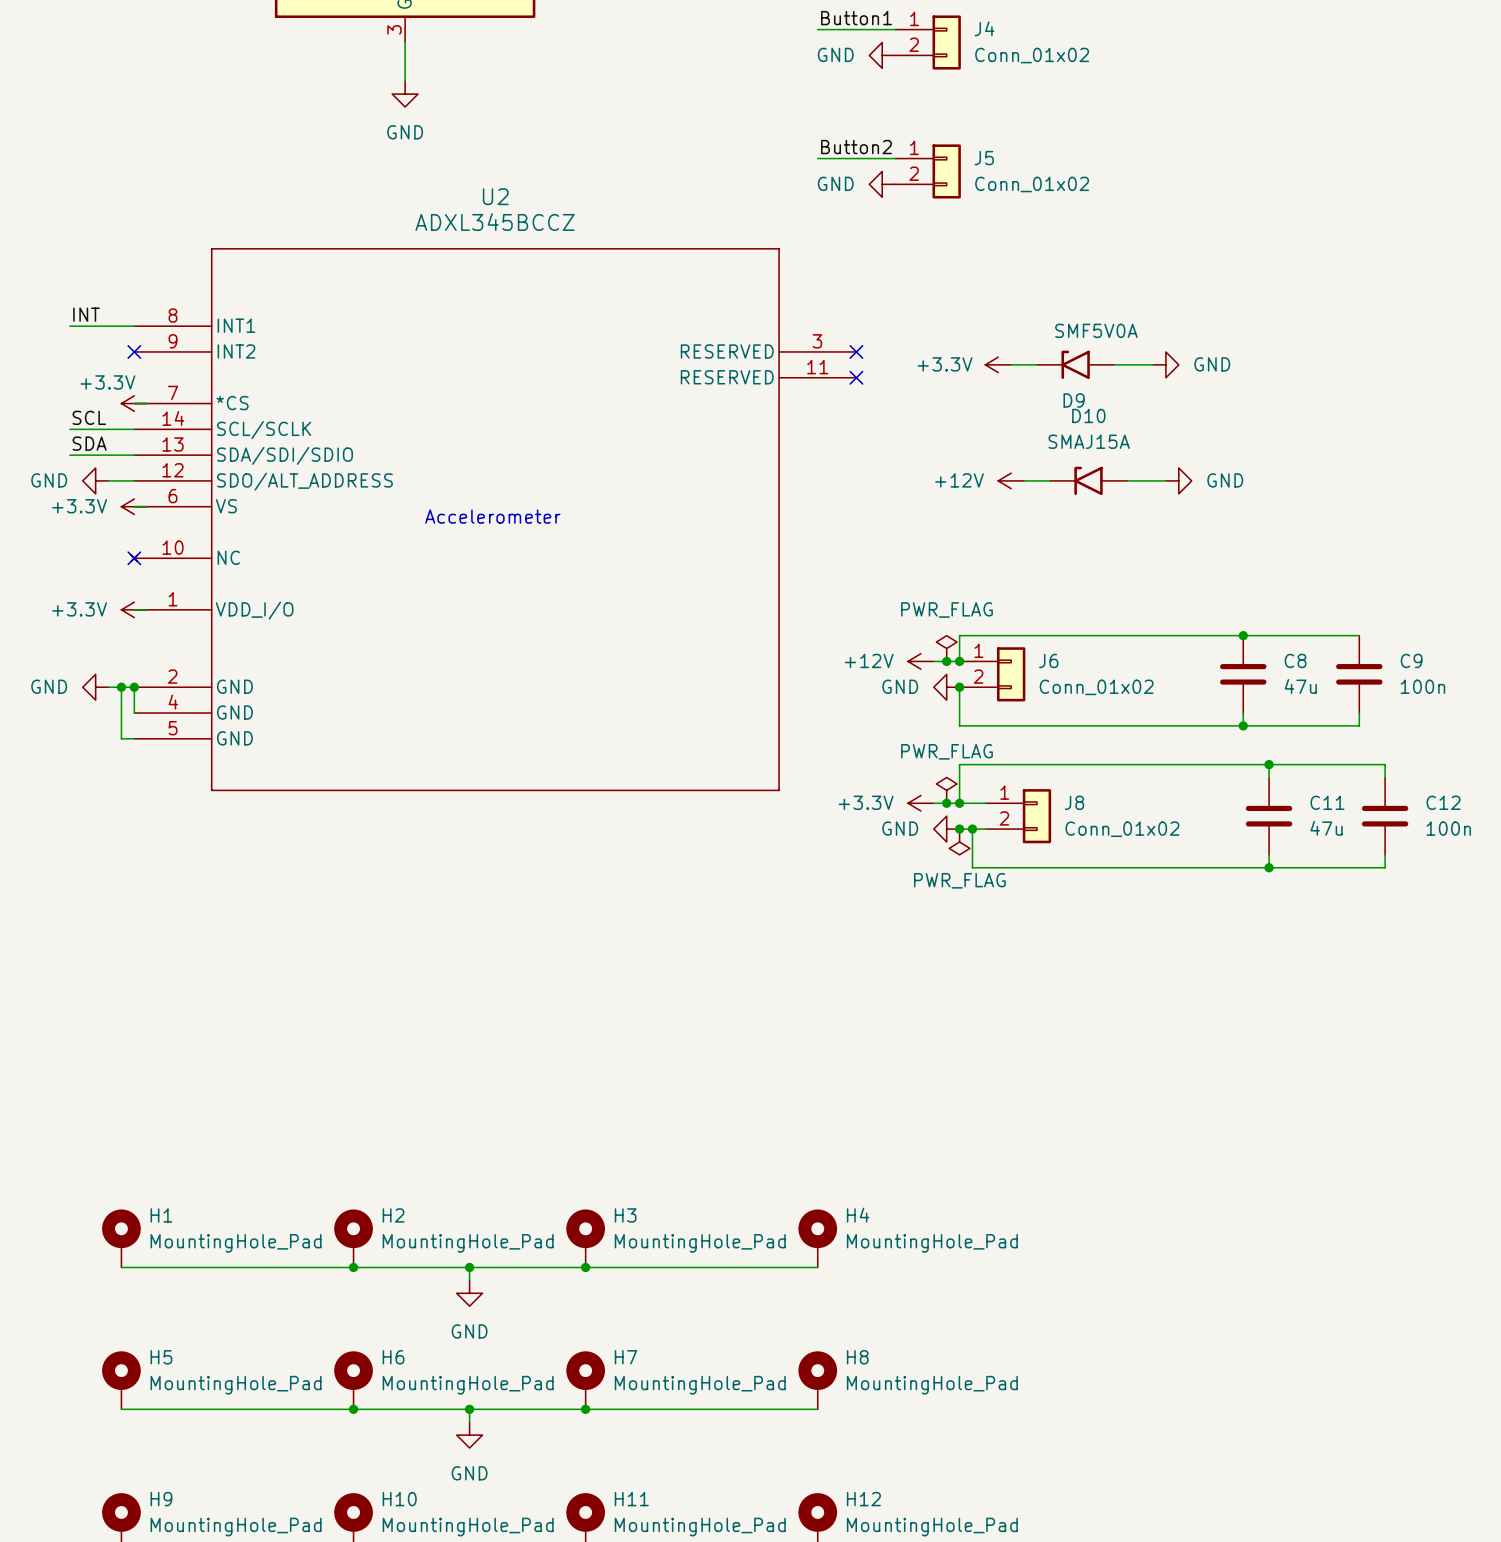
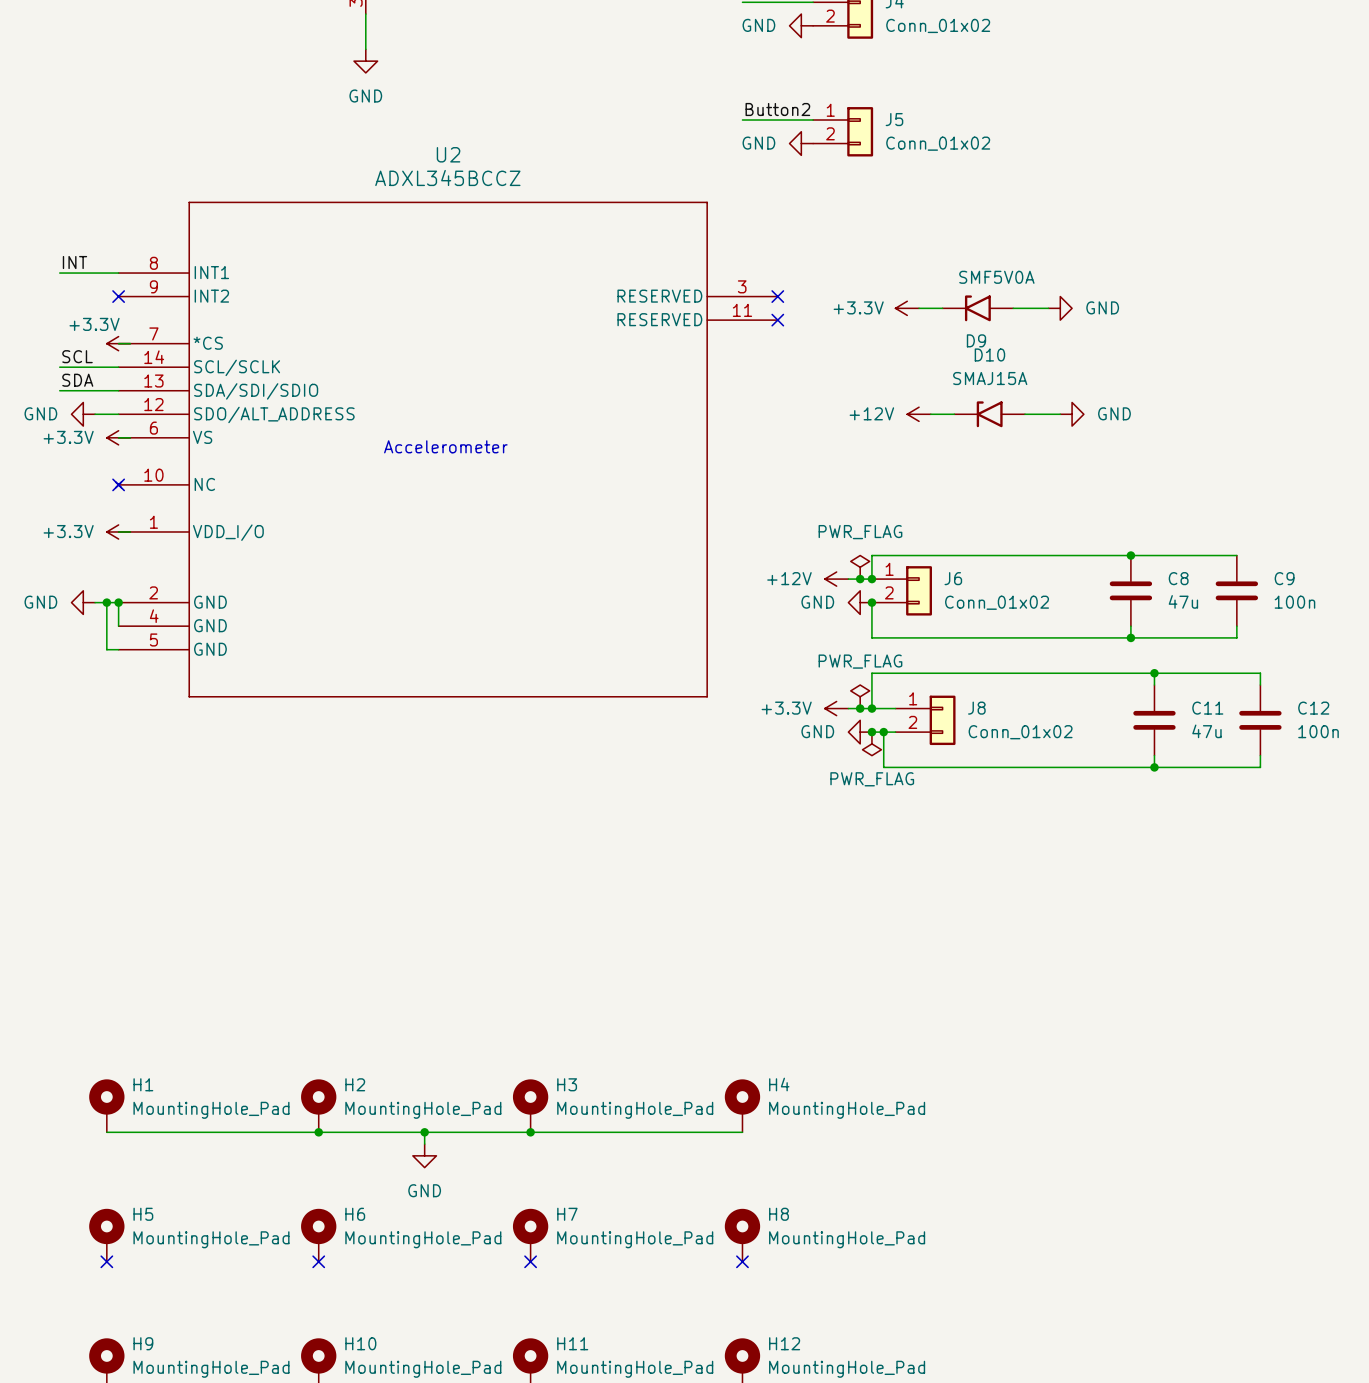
wire: (121, 1409) (817, 1409) -> none
no-connect mark: none -> (106, 1261)
junction: (353, 1409) -> none
no-connect mark: none -> (318, 1261)
wire: (469, 1409) (469, 1422) -> none
junction: (469, 1409) -> none
junction: (585, 1409) -> none
no-connect mark: none -> (530, 1261)
no-connect mark: none -> (742, 1261)
power symbol: GND (469, 1435) -> none

